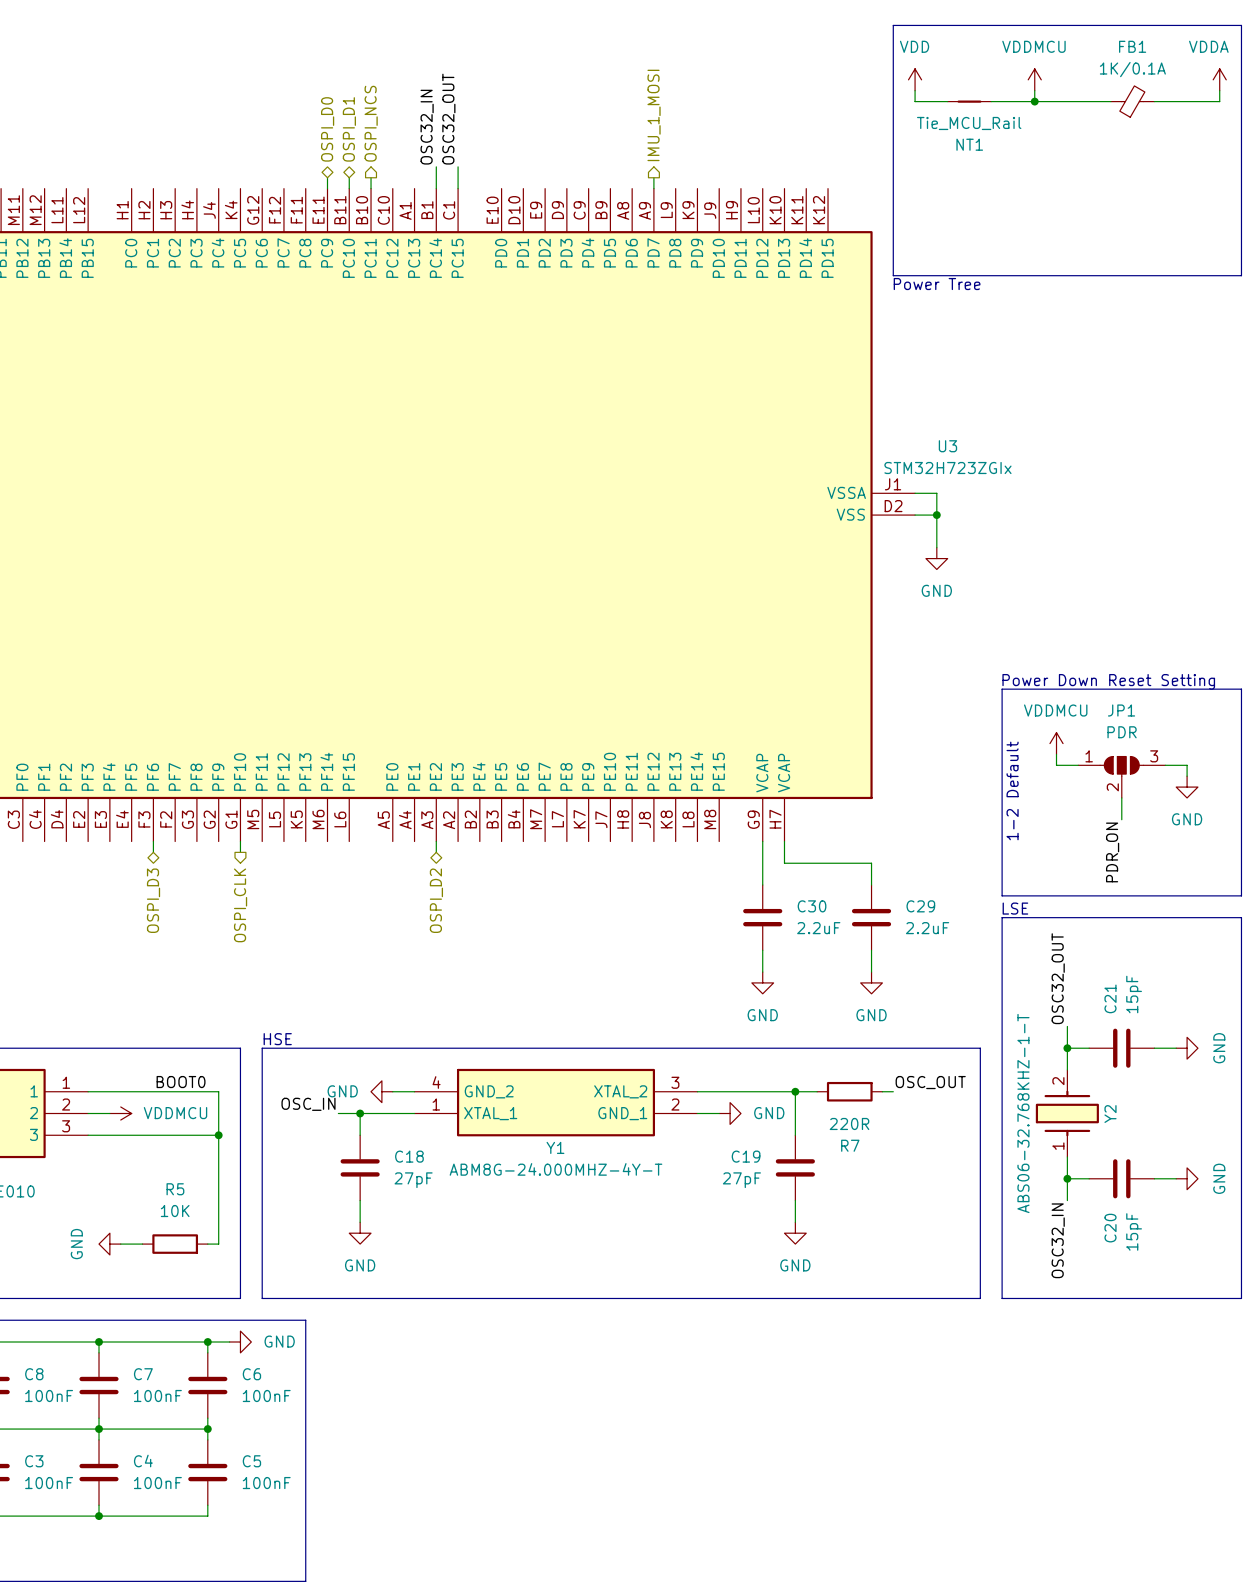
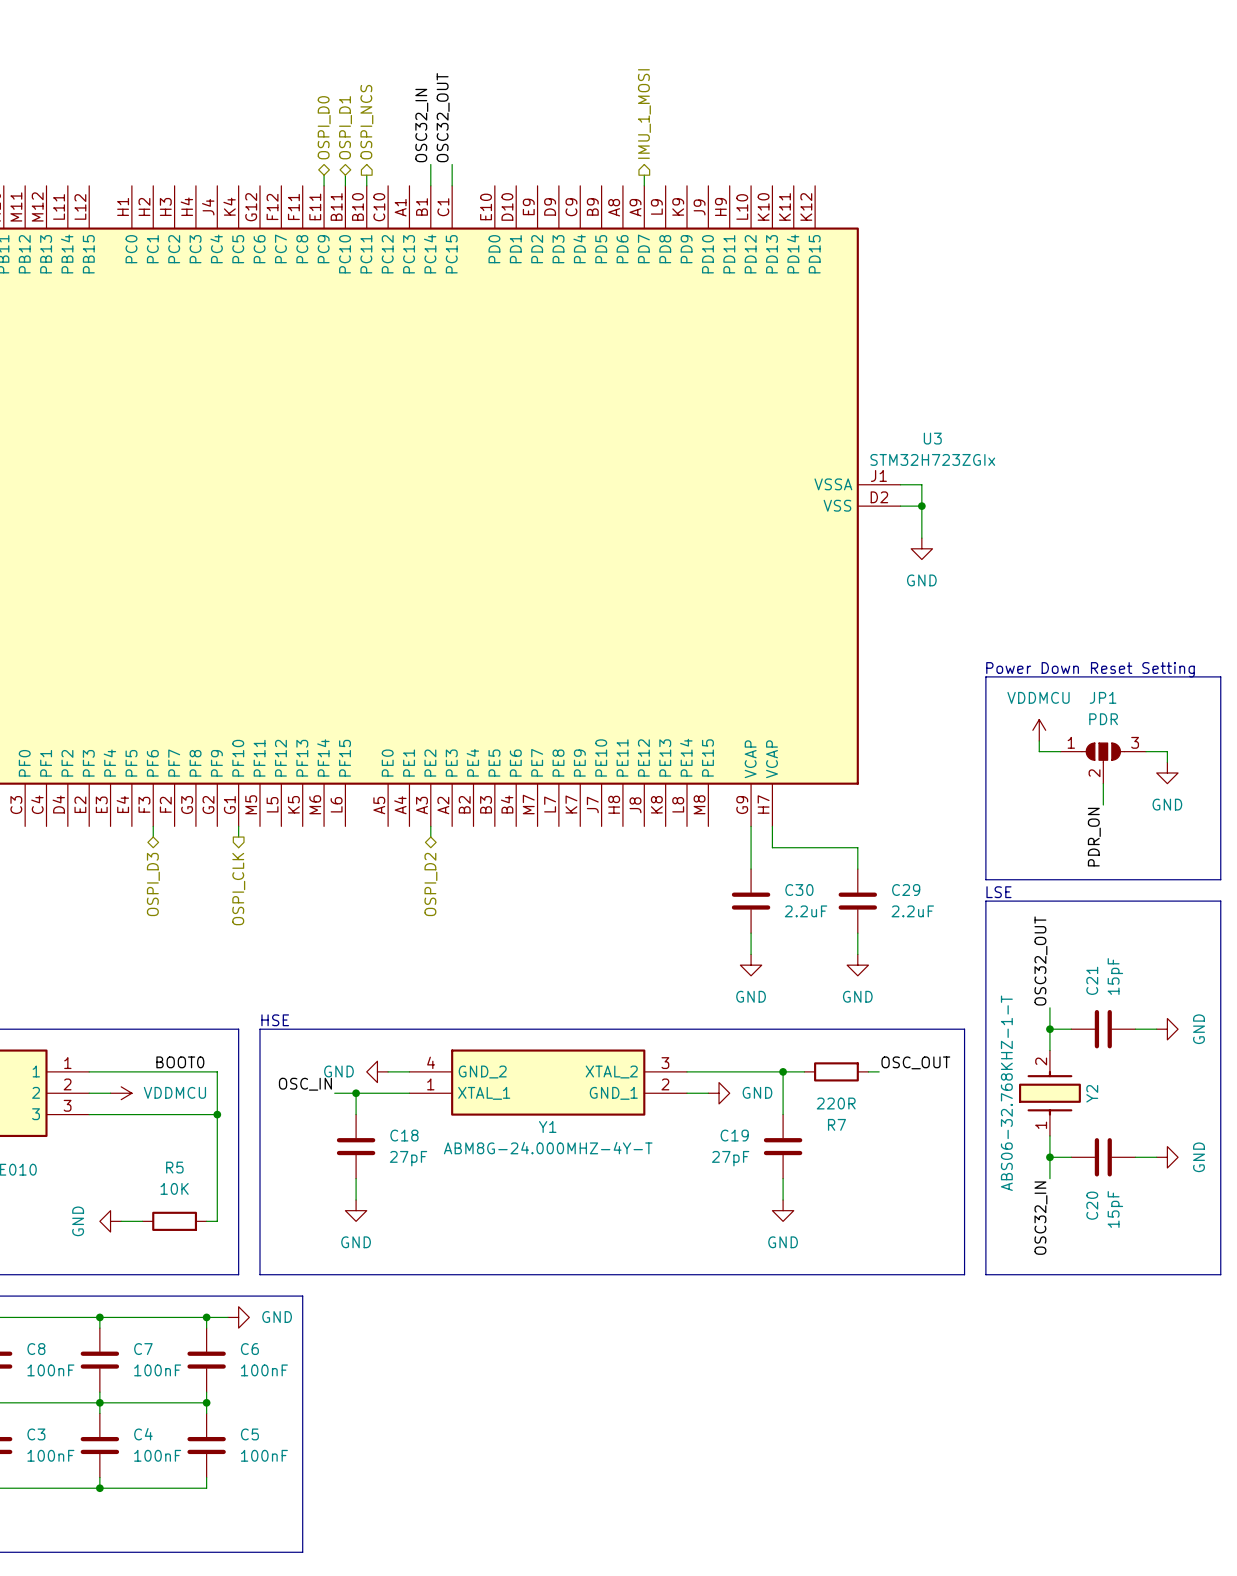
line: (893, 25) (1241, 25) (1241, 275) (893, 275) (893, 25) -> none
power symbol: VDD (915, 79) -> none
power symbol: VDDMCU (1034, 79) -> none
power symbol: VDDA (1219, 79) -> none
wire: (915, 90) (915, 101) (947, 101) -> none
wire: (1034, 90) (1034, 101) -> none
wire: (1219, 90) (1219, 101) (1154, 101) -> none
NT1: Tie_MCU_Rail (969, 101) -> none
wire: (991, 101) (1110, 101) -> none
junction: (1034, 101) -> none
FB1: 1K/0.1A (1132, 101) -> none
text: Power Tree (937, 284) -> none
text: 1-2 Default (1012, 790) -> none

